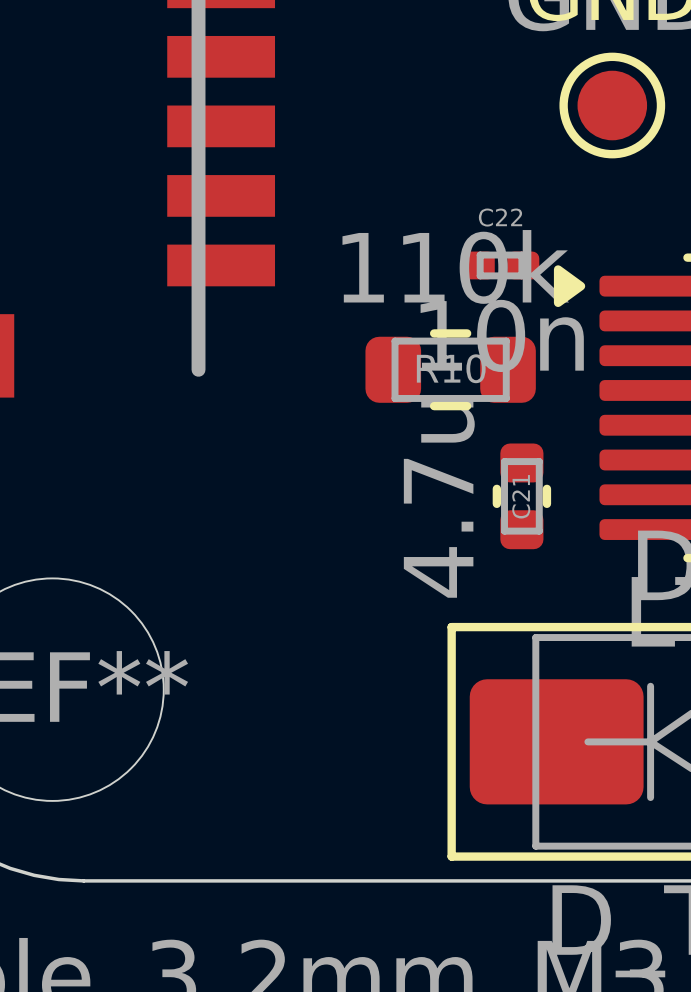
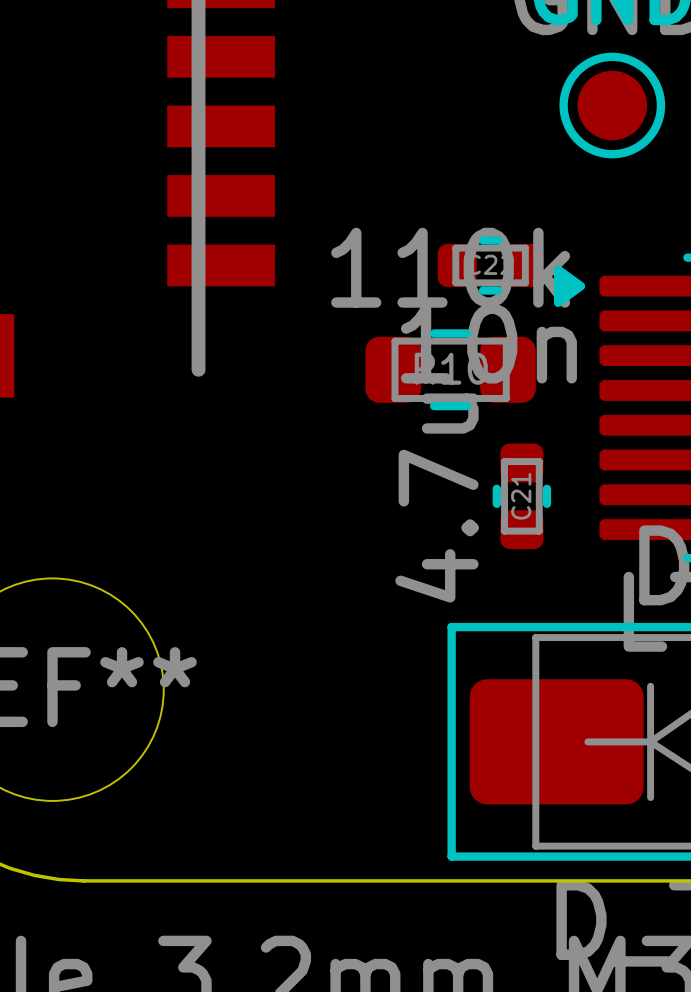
C22 footprint: [462, 251, 540, 280] -> [437, 236, 544, 295]

